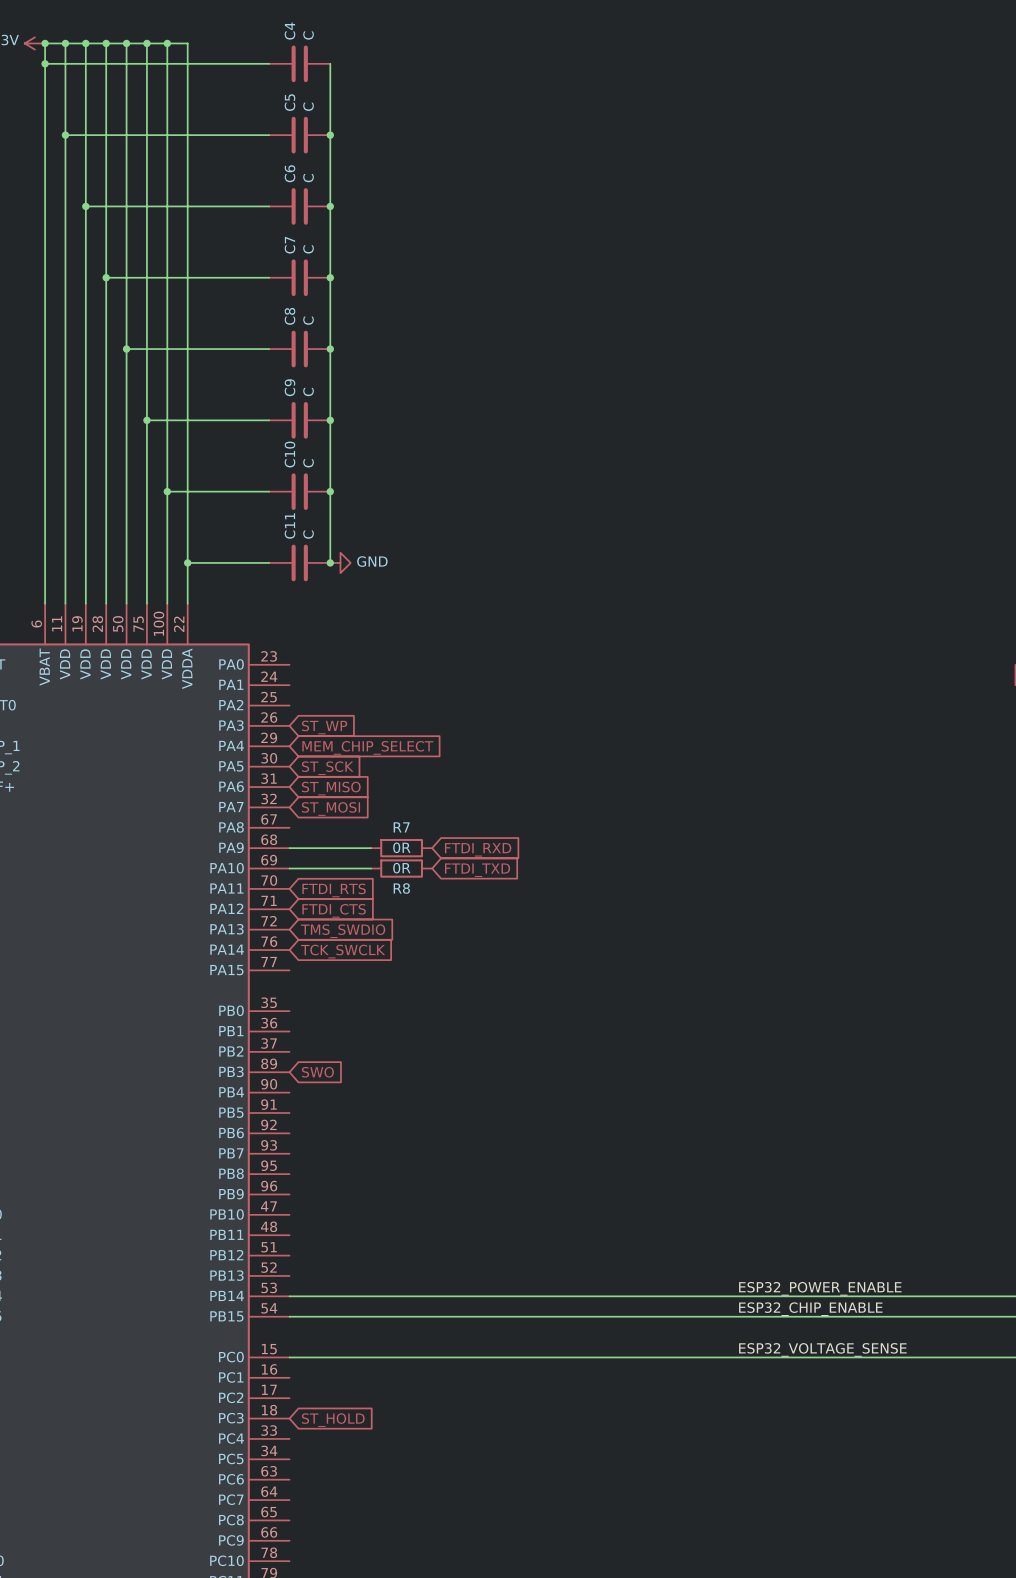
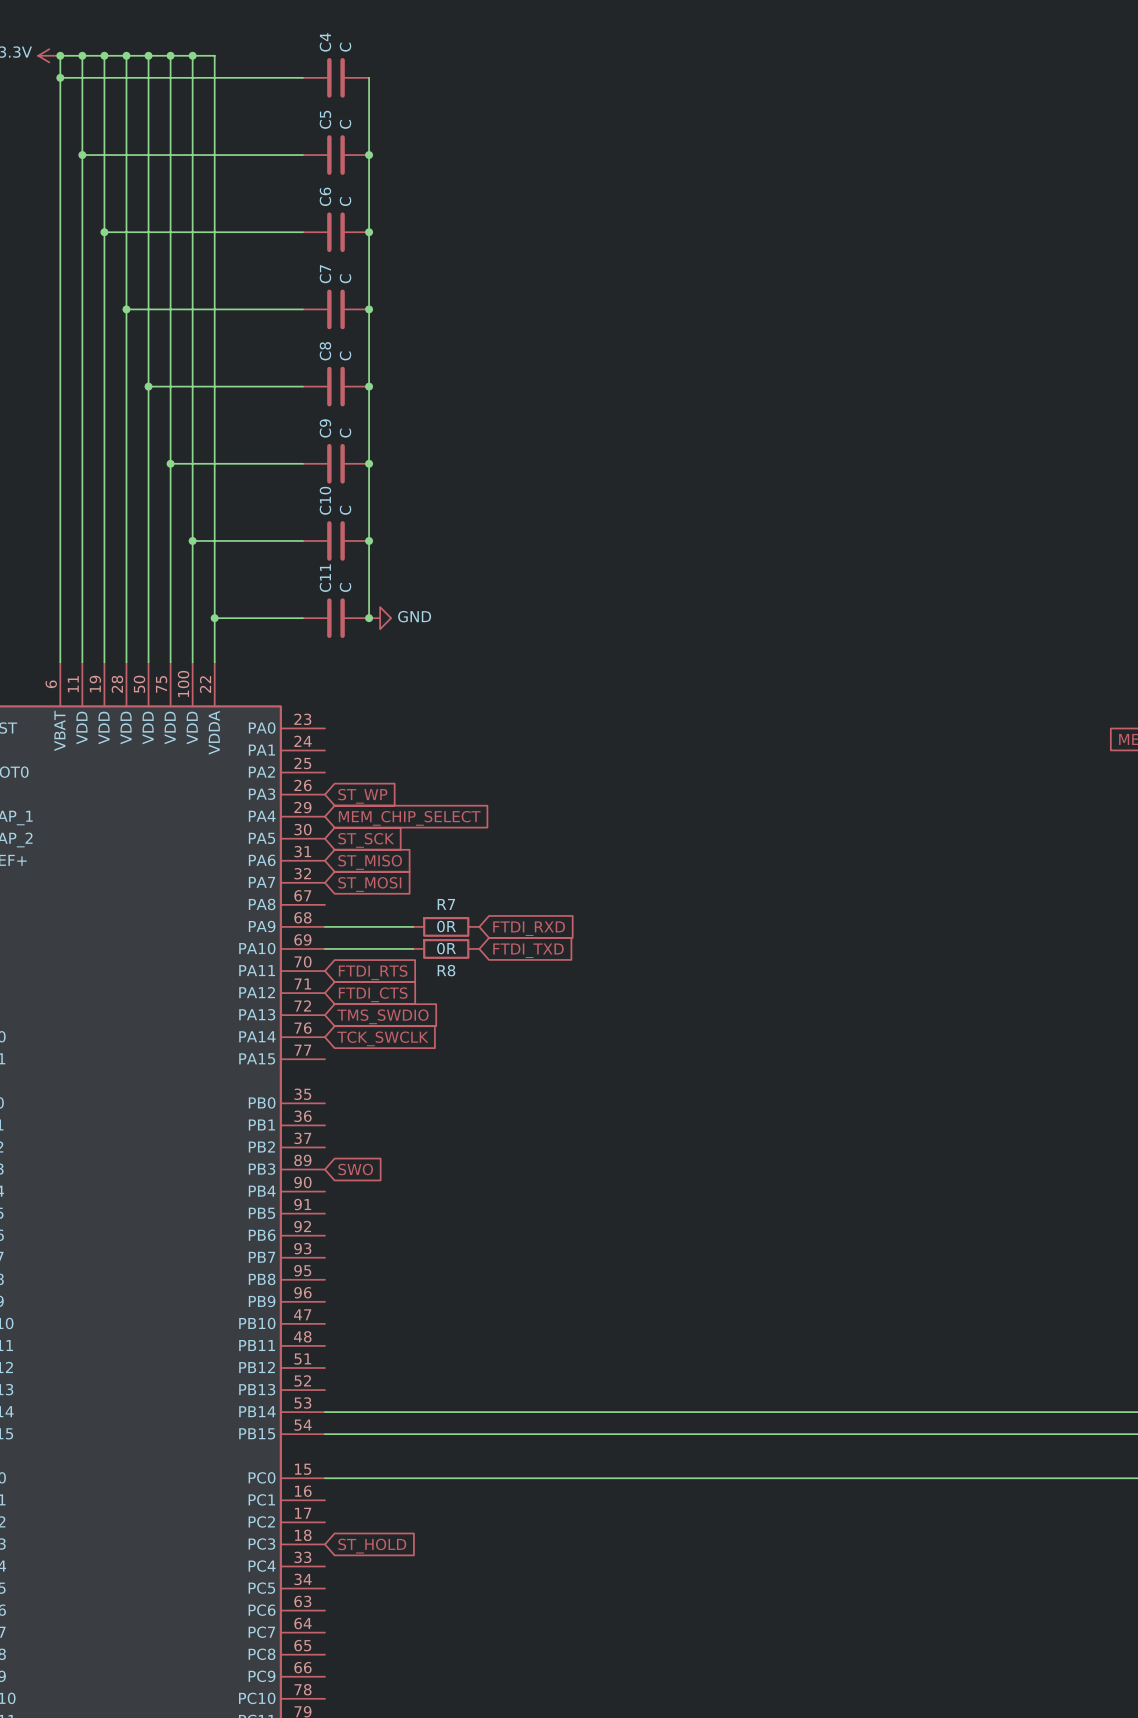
label: ESP32_POWER_ENABLE (820, 1288) -> none
label: ESP32_CHIP_ENABLE (810, 1309) -> none
label: ESP32_VOLTAGE_SENSE (822, 1349) -> none

